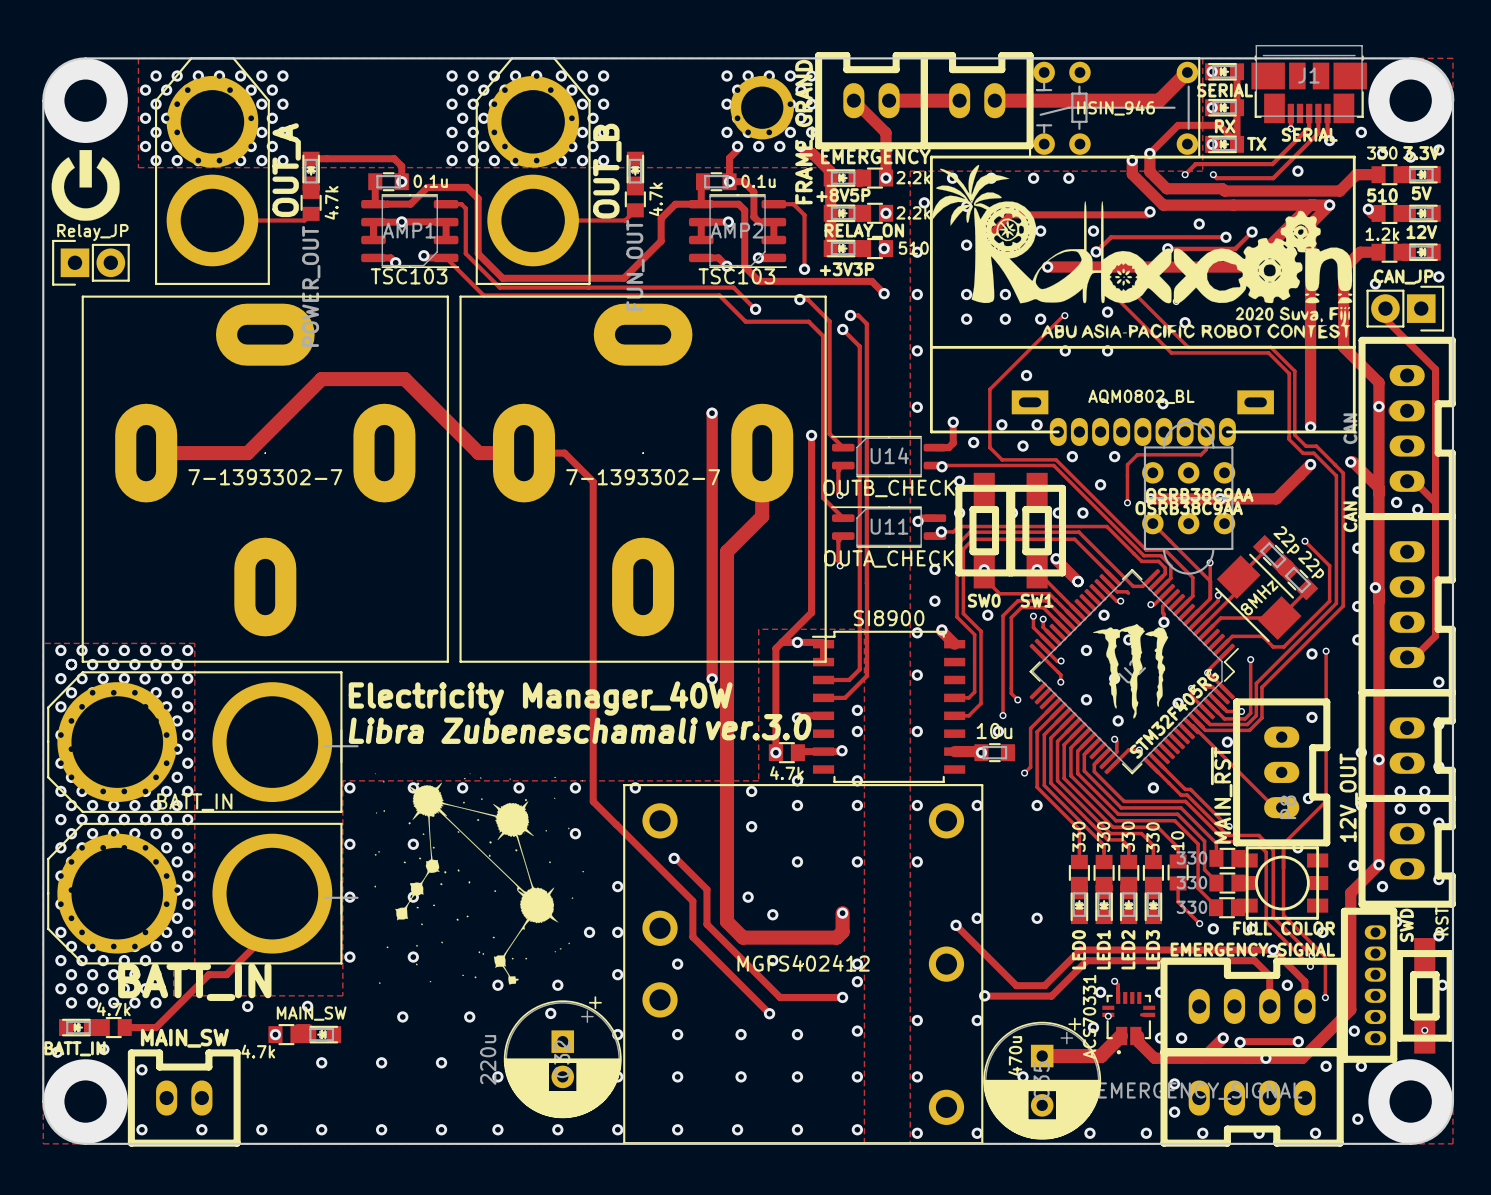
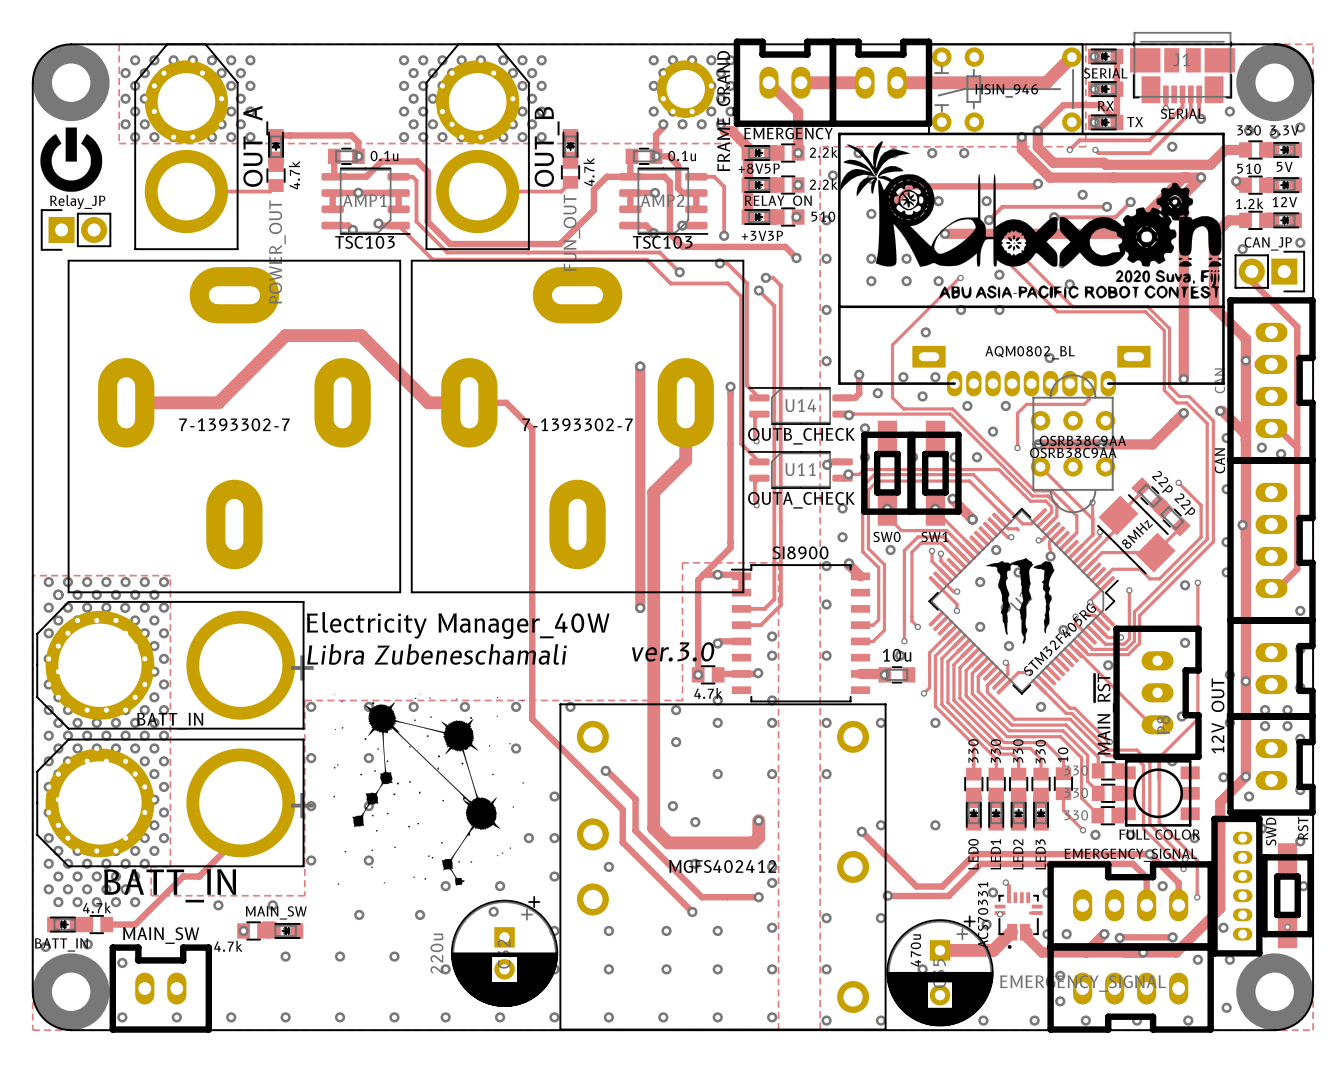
via: none -> (144, 863)

